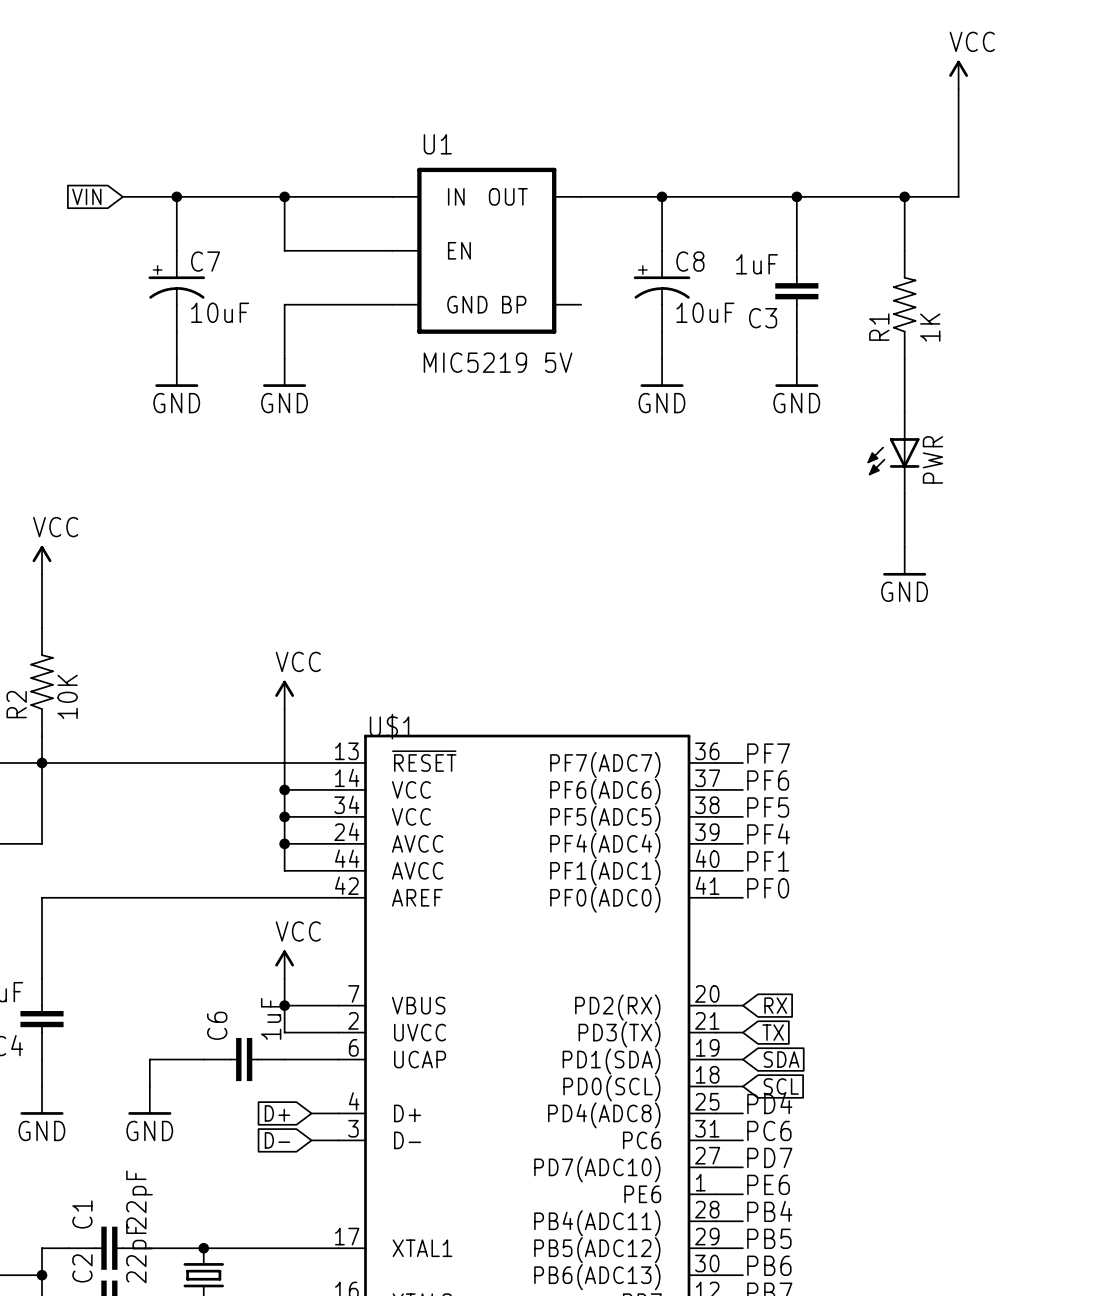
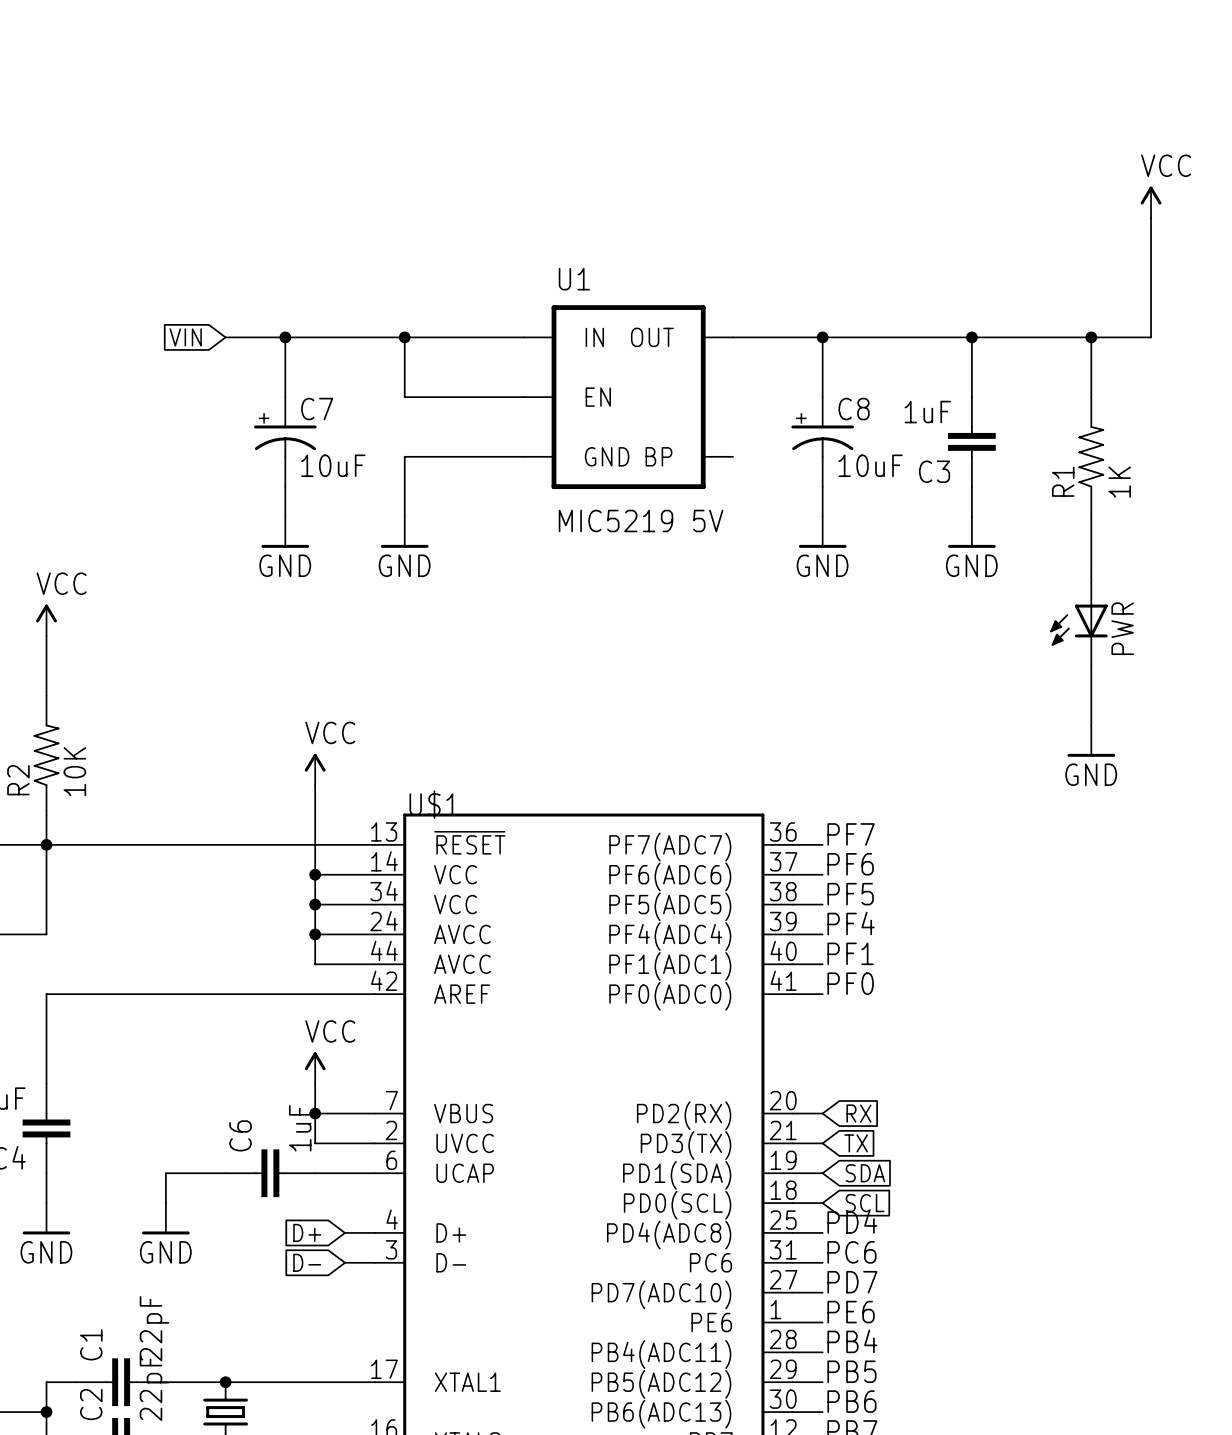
power symbol position: VCC (958, 74) -> VCC (1151, 202)
wire: (958, 89) (958, 196) (581, 196) -> (1151, 218) (1151, 337) (733, 337)
global label position: VIN (86, 196) -> VIN (185, 337)
wire: (122, 196) (392, 196) -> none
wire: (176, 196) (176, 250) -> (285, 337) (285, 397)
junction: (176, 196) -> none
wire: (284, 196) (284, 250) (392, 250) -> (404, 337) (404, 397) (524, 397)
junction: (284, 196) -> none
wire: (662, 196) (662, 250) -> (822, 337) (822, 397)
junction: (662, 196) -> none
wire: (796, 196) (796, 250) -> (971, 337) (971, 397)
junction: (796, 196) -> none
wire: (904, 196) (904, 250) -> (1091, 337) (1091, 397)
junction: (904, 196) -> none
U1 position: (486, 250) -> (628, 397)
C7 position: (176, 291) -> (285, 441)
C8 position: (662, 291) -> (822, 441)
C3 position: (796, 291) -> (971, 441)
junction: none -> (285, 337)
wire: (284, 304) (284, 358) -> (315, 337) (225, 337)
junction: none -> (404, 337)
wire: none -> (434, 337) (524, 337)
junction: none -> (822, 337)
junction: none -> (971, 337)
R1 position: (904, 304) -> (1091, 456)
junction: none -> (1091, 337)
wire: (176, 331) (176, 358) -> (285, 486) (285, 516)
wire: (662, 331) (662, 358) -> (822, 486) (822, 516)
wire: (796, 331) (796, 358) -> (971, 486) (971, 516)
wire: (904, 358) (904, 412) -> (1091, 516) (1091, 576)
power symbol: GND (176, 372) -> none
power symbol: GND (284, 372) -> none
power symbol: GND (662, 372) -> none
power symbol: GND (796, 372) -> none
wire: none -> (524, 456) (404, 456) (404, 516)
PWR position: (893, 452) -> (1078, 620)
power symbol: none -> GND (285, 532)
power symbol: none -> GND (404, 532)
power symbol: none -> GND (822, 532)
power symbol: none -> GND (971, 532)
wire: (904, 493) (904, 547) -> (1091, 665) (1091, 725)
power symbol: GND (904, 561) -> none
power symbol: none -> GND (1091, 741)

